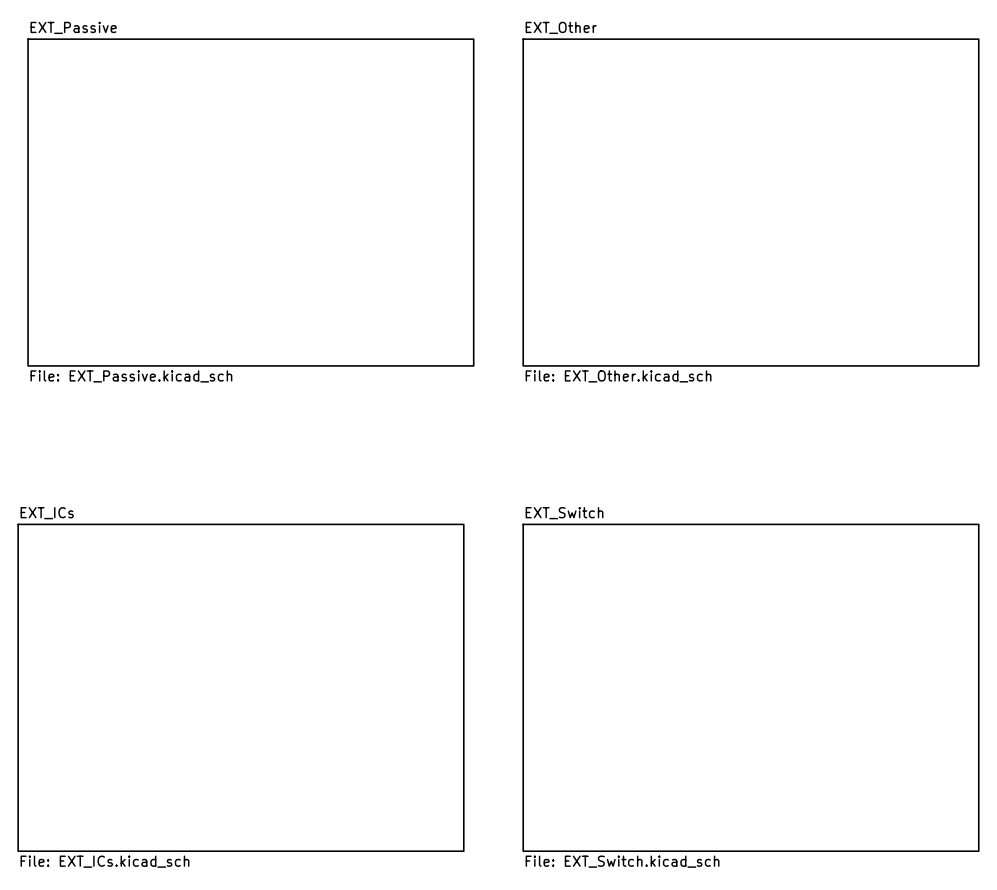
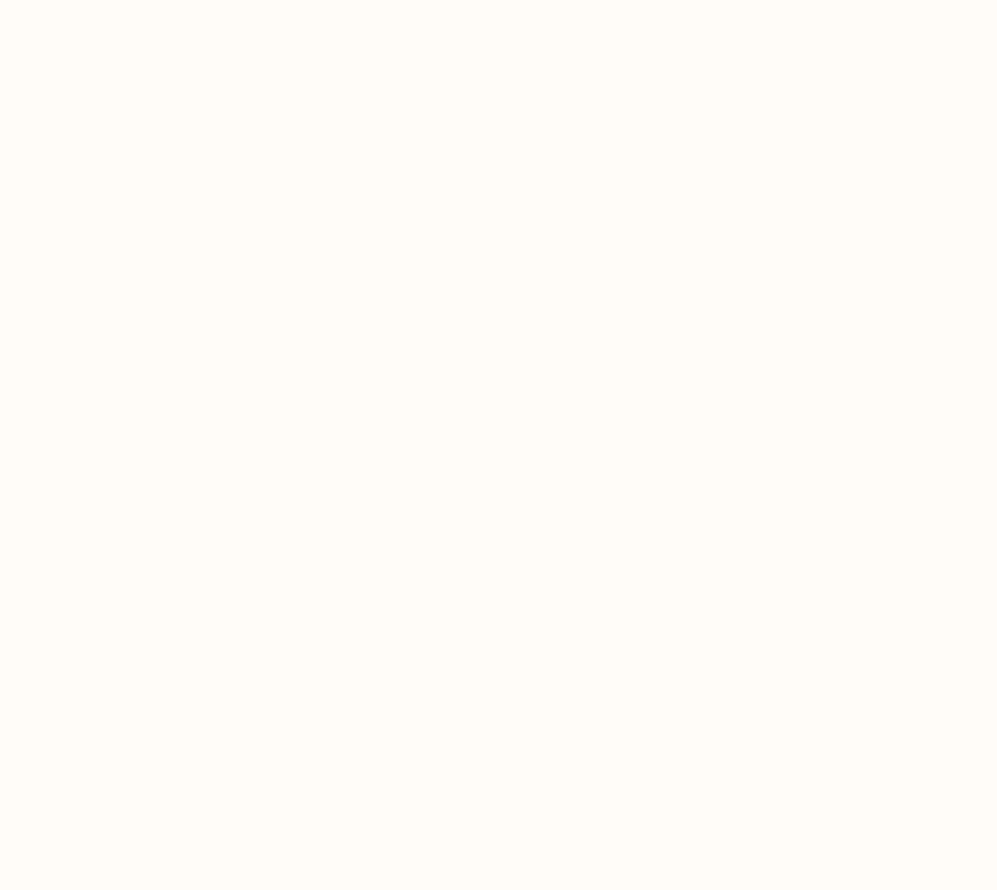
sheet EXT_Passive: File: EXT_Passive.kicad_sch (250, 202) -> none
sheet EXT_Other: File: EXT_Other.kicad_sch (750, 202) -> none
sheet EXT_ICs: File: EXT_ICs.kicad_sch (240, 687) -> none
sheet EXT_Switch: File: EXT_Switch.kicad_sch (750, 687) -> none

